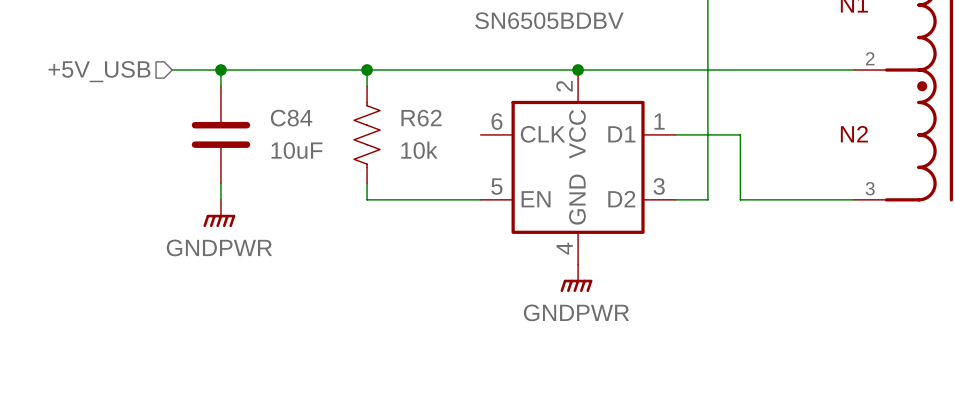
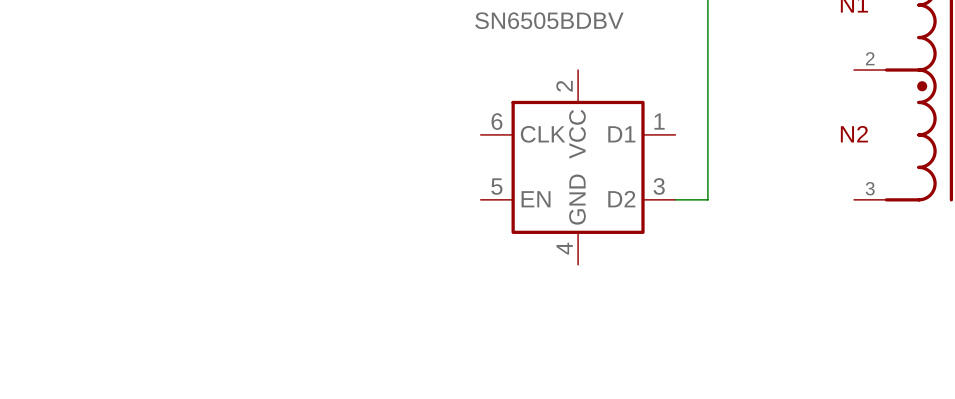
wire: (172, 70) (854, 70) -> none
wire: (220, 70) (220, 86) -> none
junction: (220, 70) -> none
wire: (367, 70) (367, 86) -> none
junction: (367, 70) -> none
junction: (578, 70) -> none
hierarchical label: +5V_USB (99, 71) -> none
C84: 10uF (220, 134) -> none
R62: 10k (367, 134) -> none
wire: (675, 134) (740, 134) (740, 199) (854, 199) -> none
wire: (220, 183) (220, 199) -> none
wire: (367, 183) (367, 199) (480, 199) -> none
power symbol: GNDPWR (219, 213) -> none
power symbol: GNDPWR (576, 278) -> none

